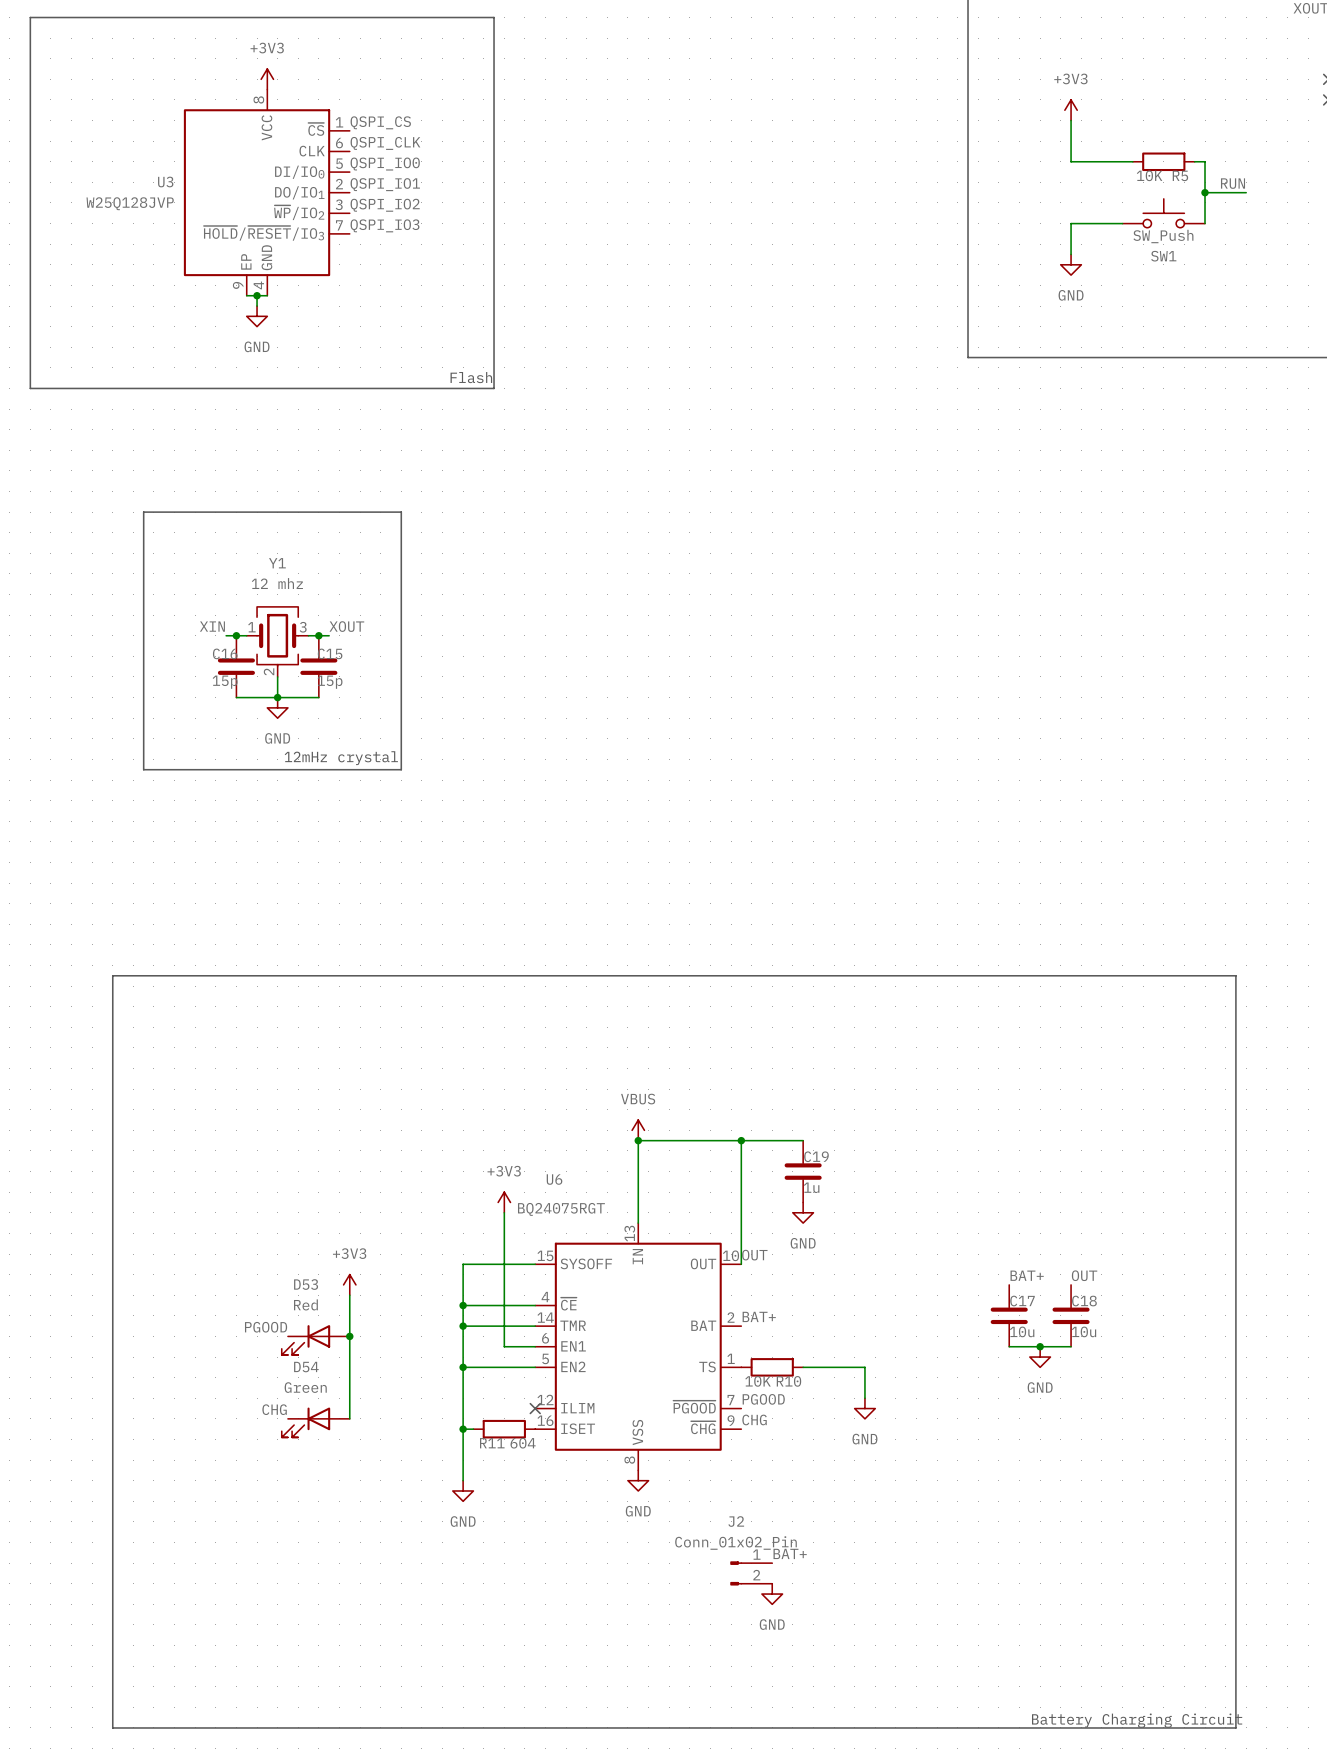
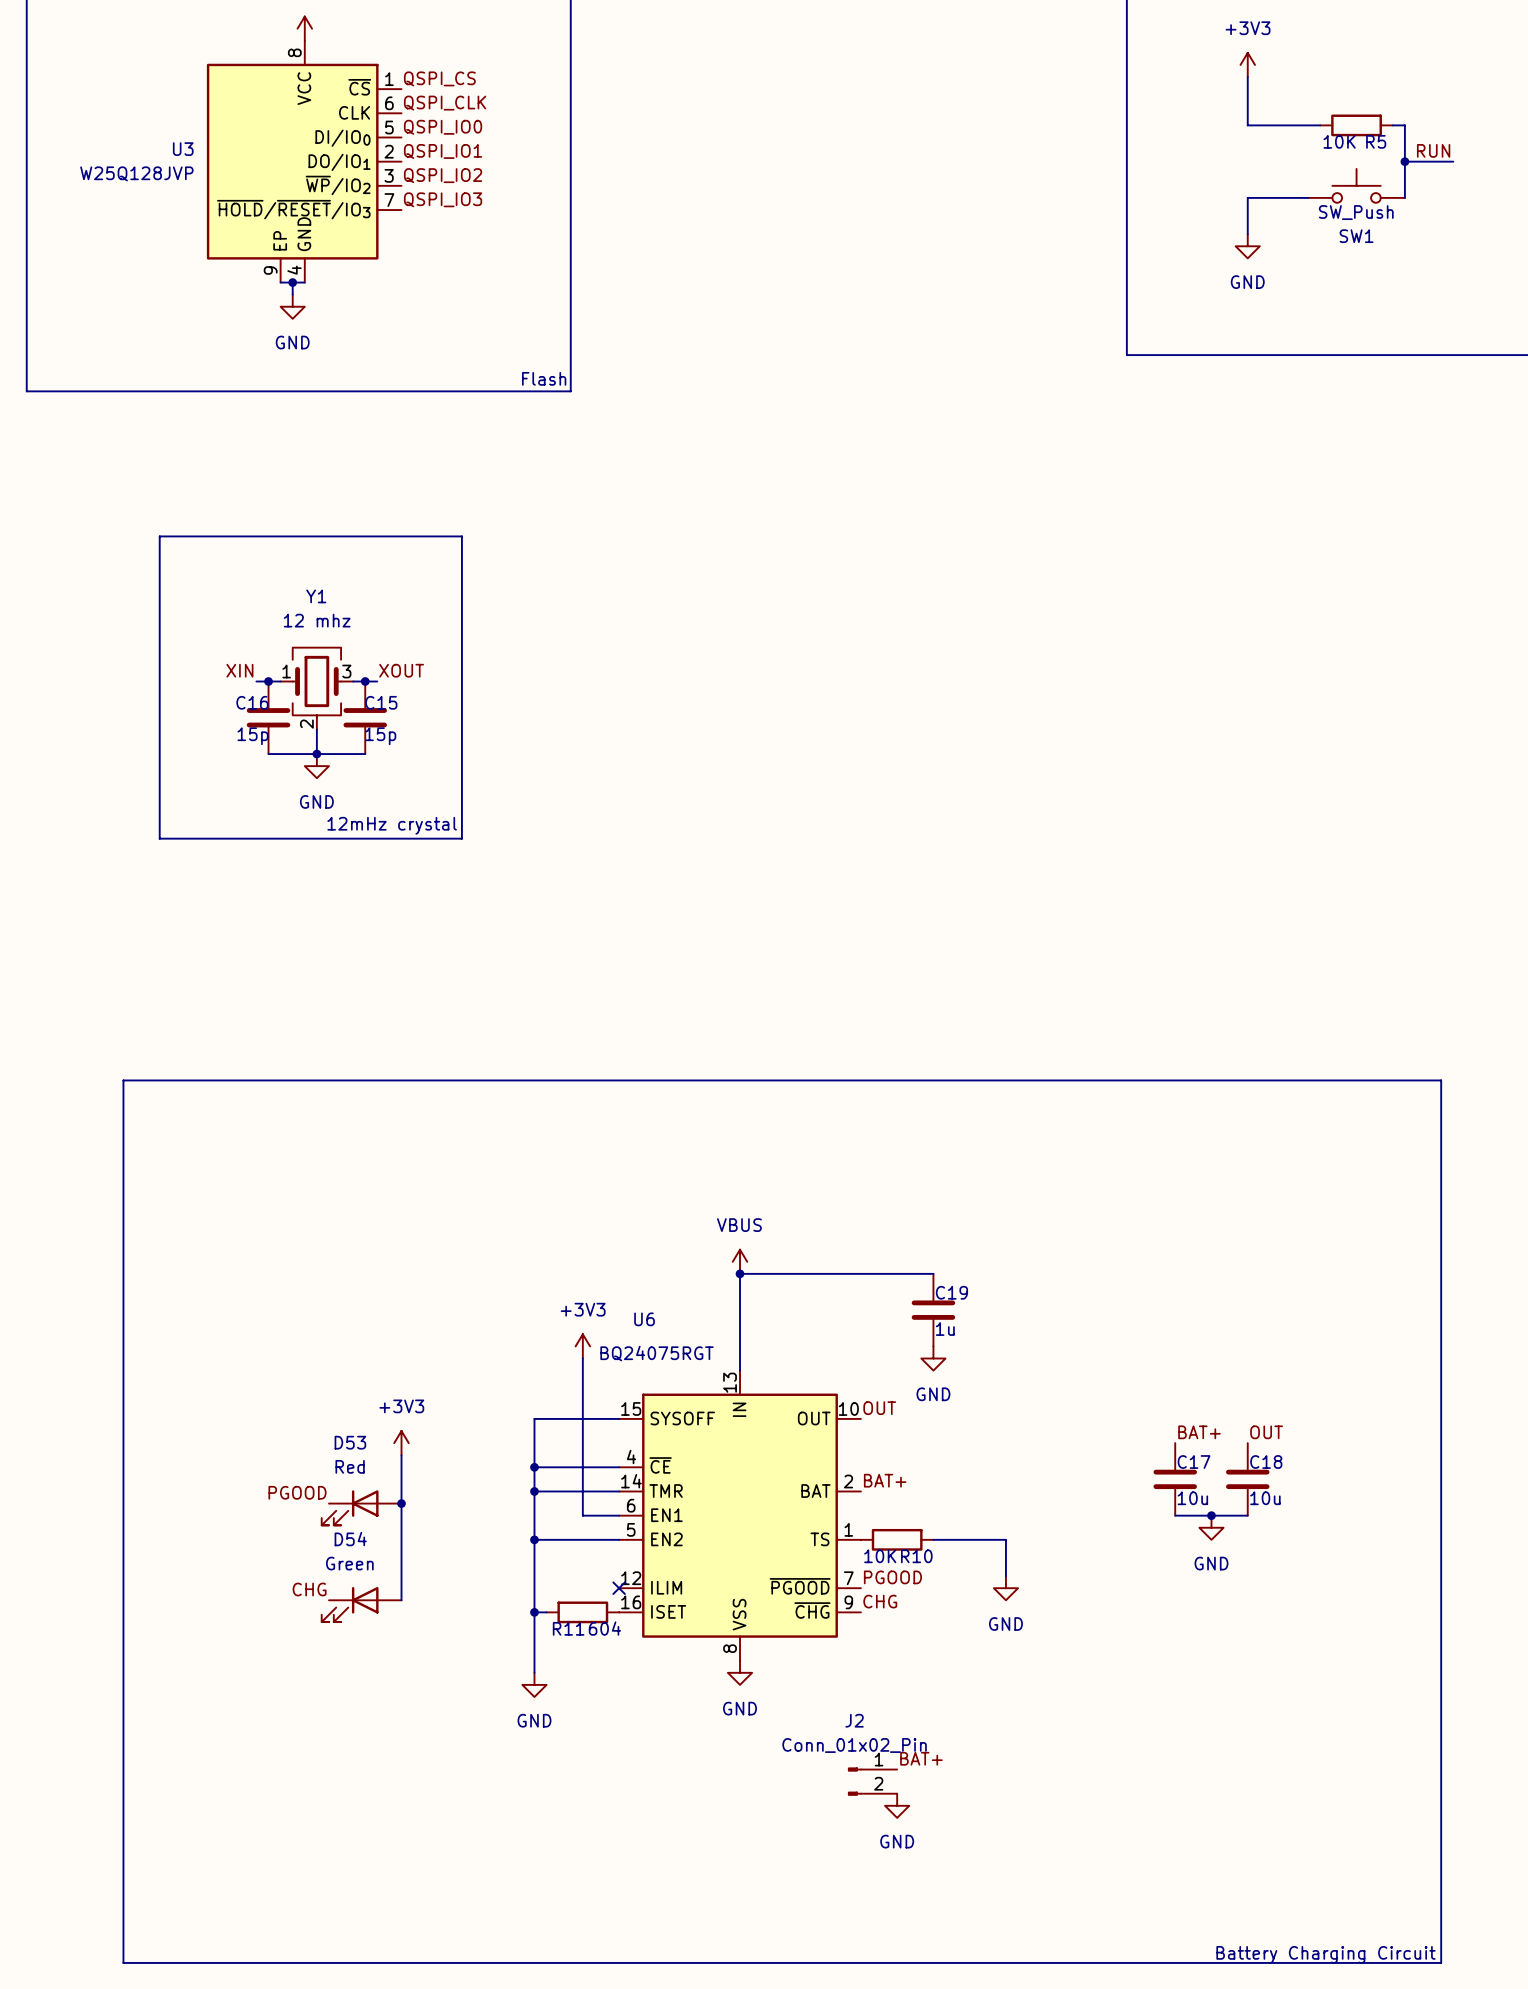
wire: (741, 1140) (741, 1264) -> none
junction: (741, 1140) -> none

